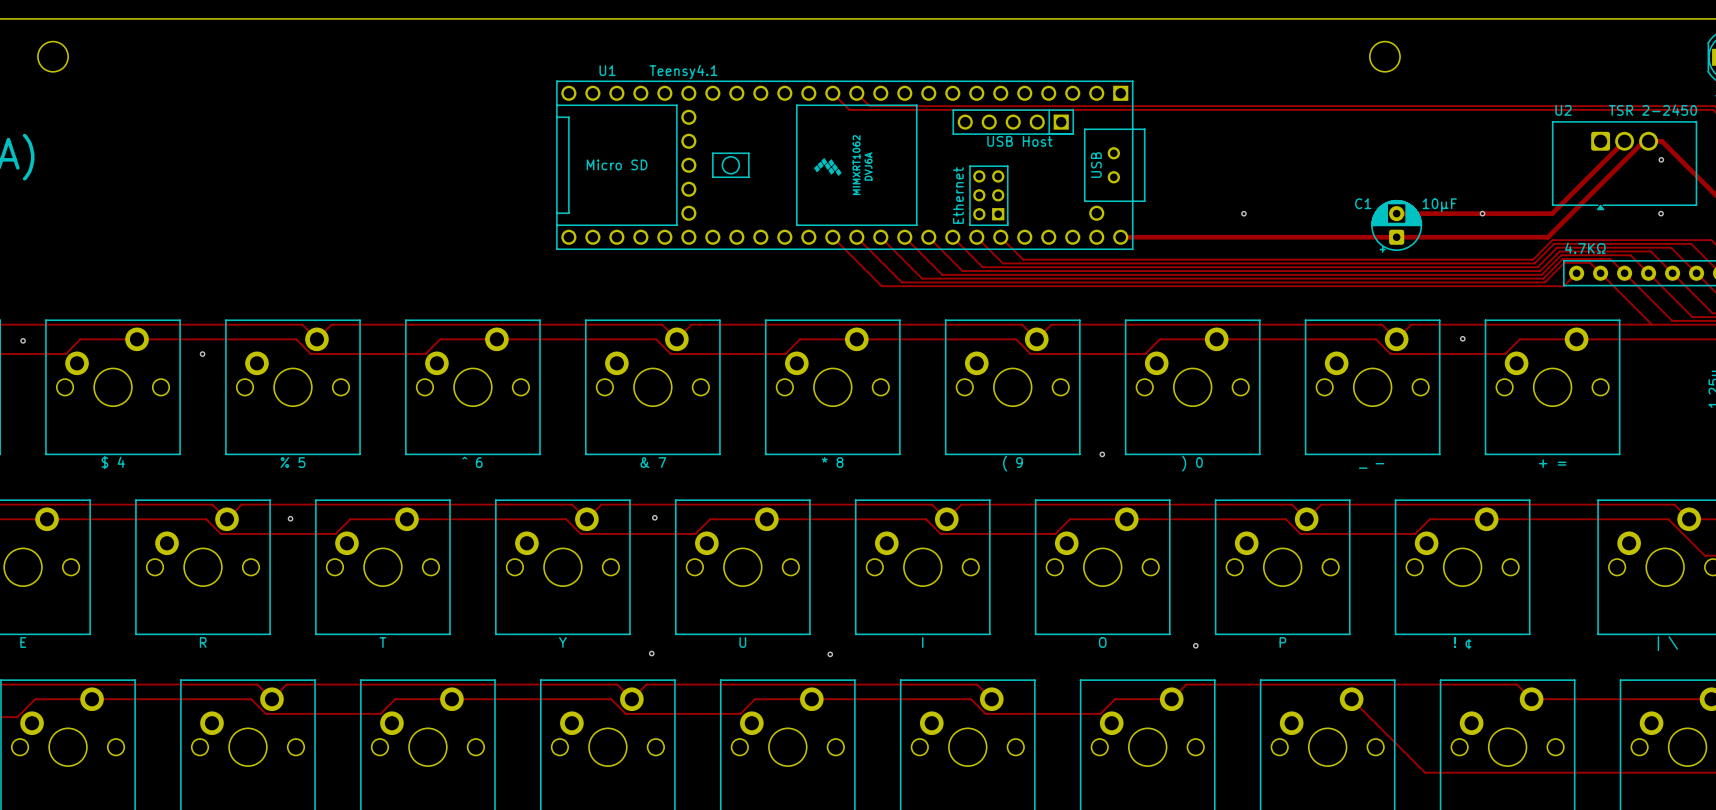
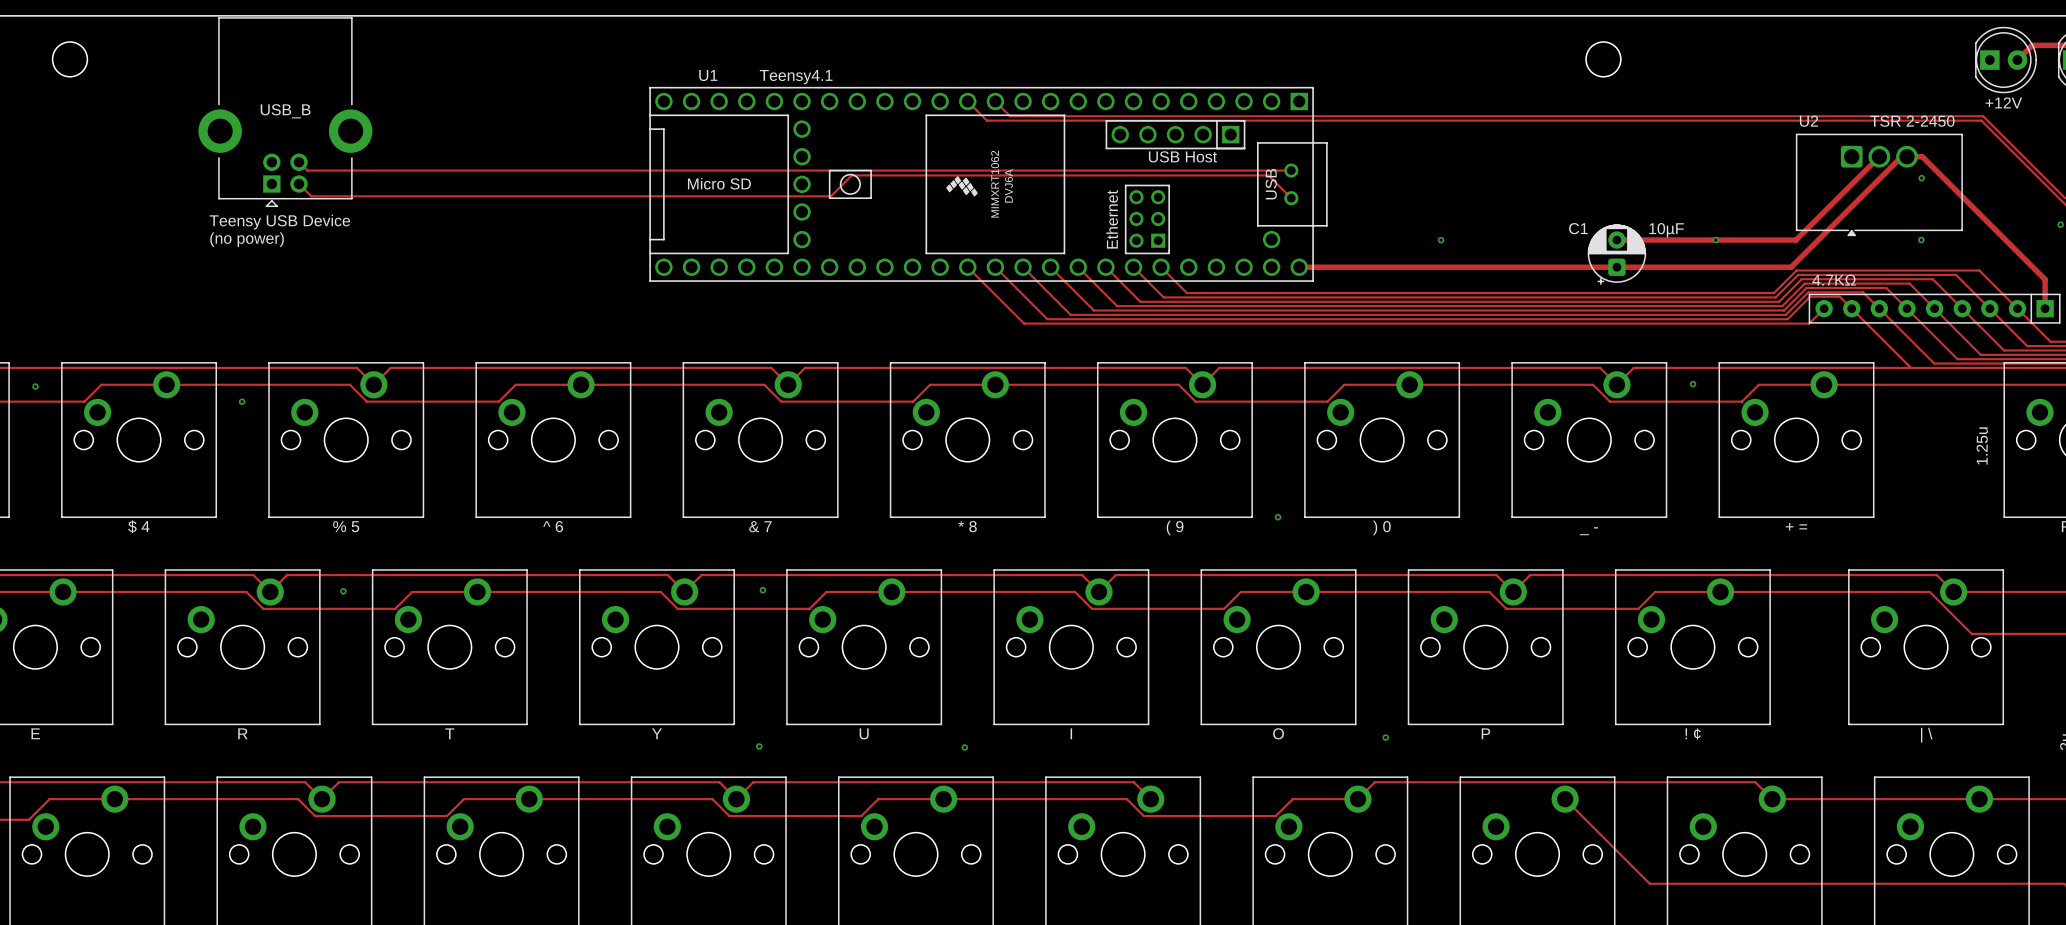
part: none -> USB_B (285, 112)
track: none -> (299, 162) (307, 170) (1291, 170)
track: none -> (299, 184) (311, 196) (830, 196) (851, 175) (1268, 175) (1291, 198)
text: none -> Teensy USB Device (279, 222)
text: none -> (no power) (247, 239)

